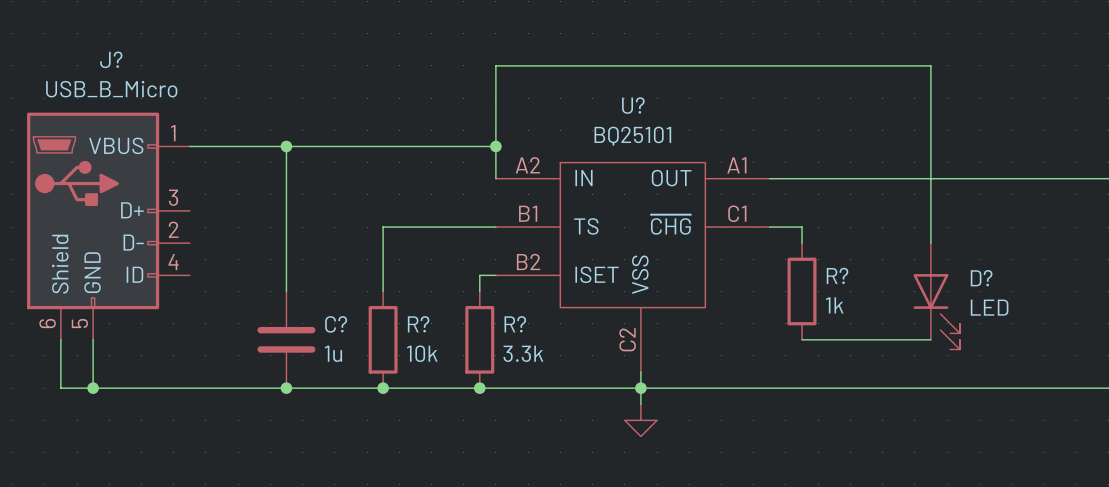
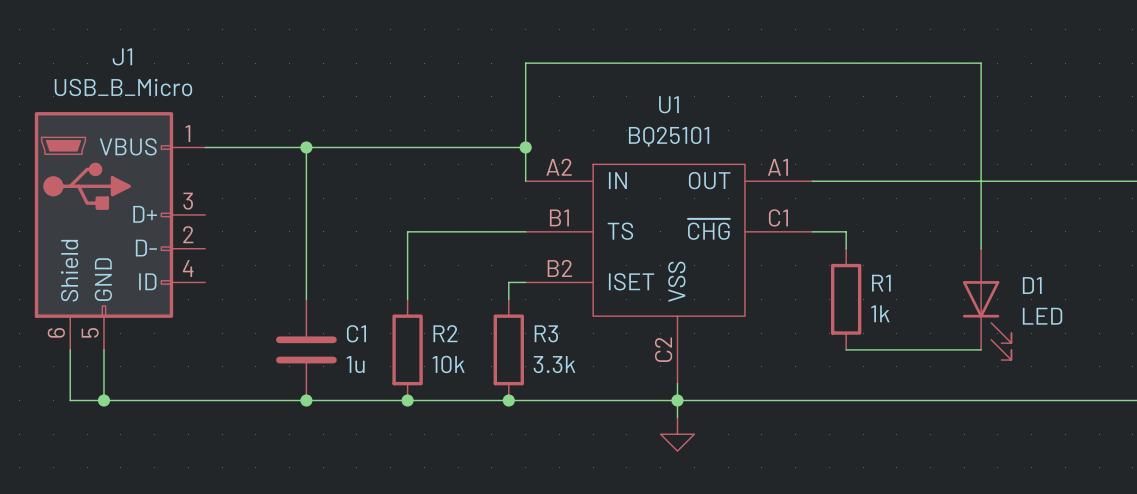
J? name: J? (111, 59) -> J1 (122, 56)
U? name: U? (633, 105) -> U1 (668, 104)
R? name: R? (837, 275) -> R1 (881, 283)
D? name: D? (981, 278) -> D1 (1032, 285)
C? name: C? (336, 324) -> C1 (356, 333)
R? name: R? (418, 324) -> R2 (445, 333)
R? name: R? (515, 324) -> R3 (546, 333)

